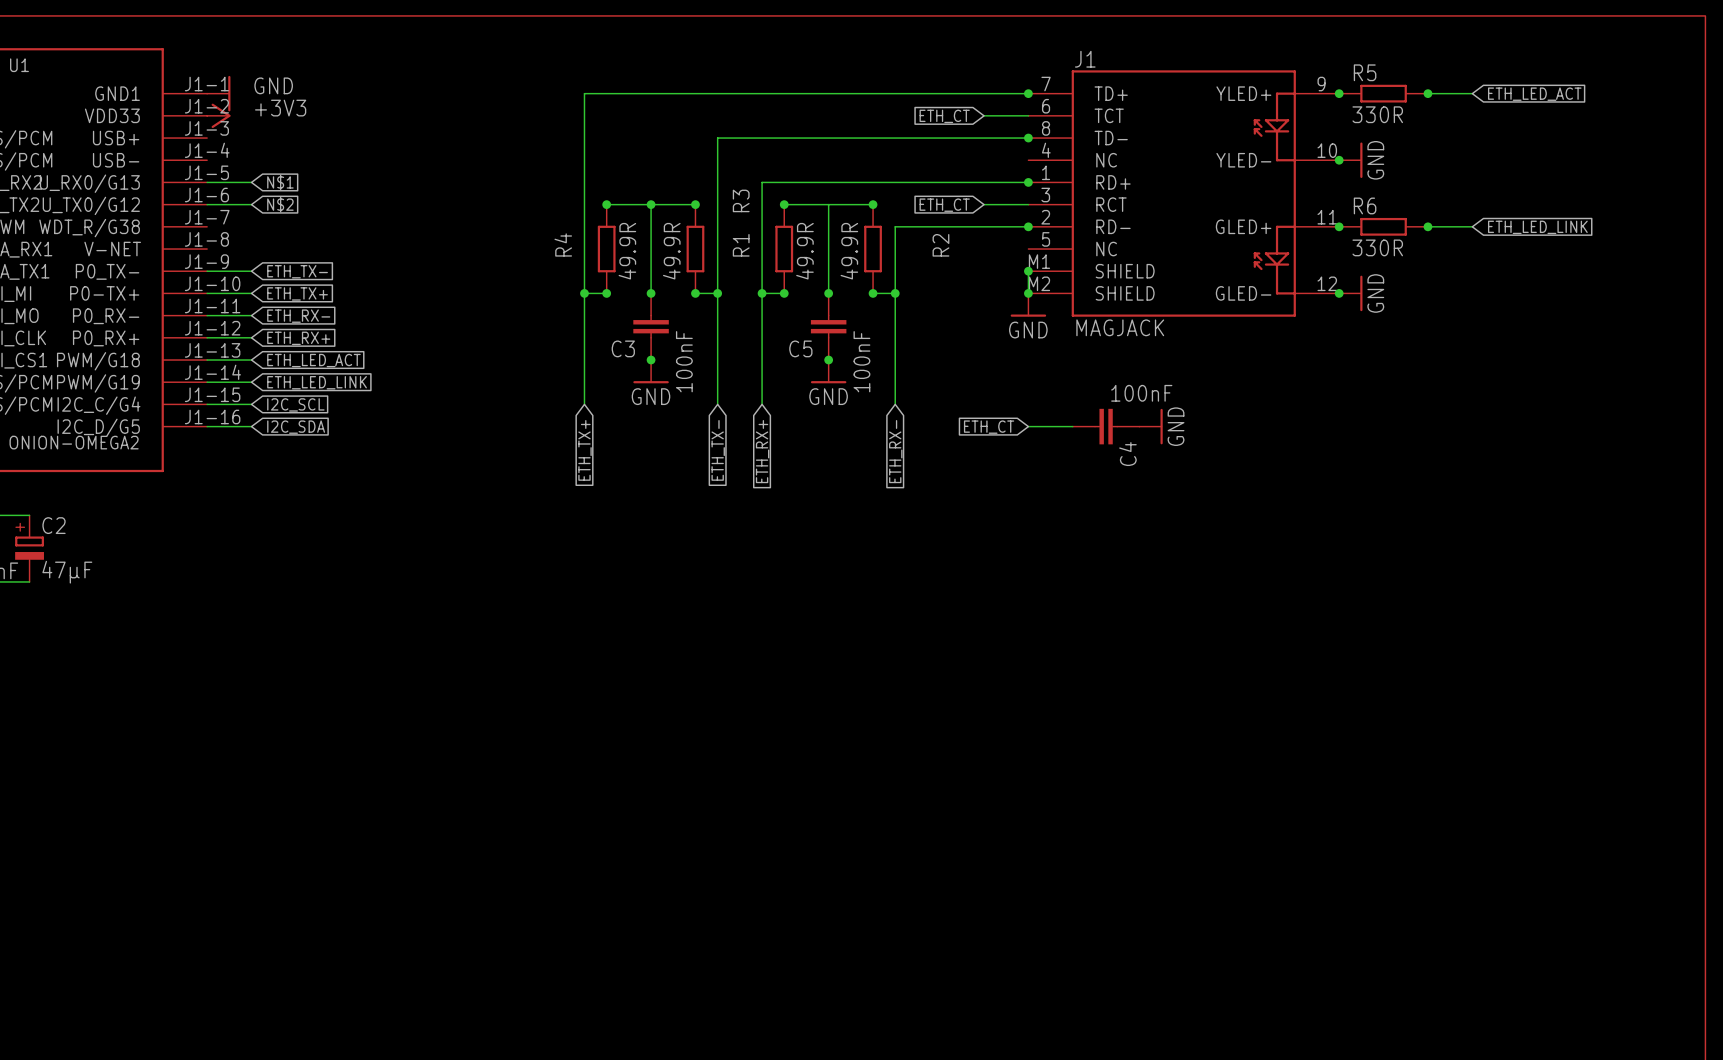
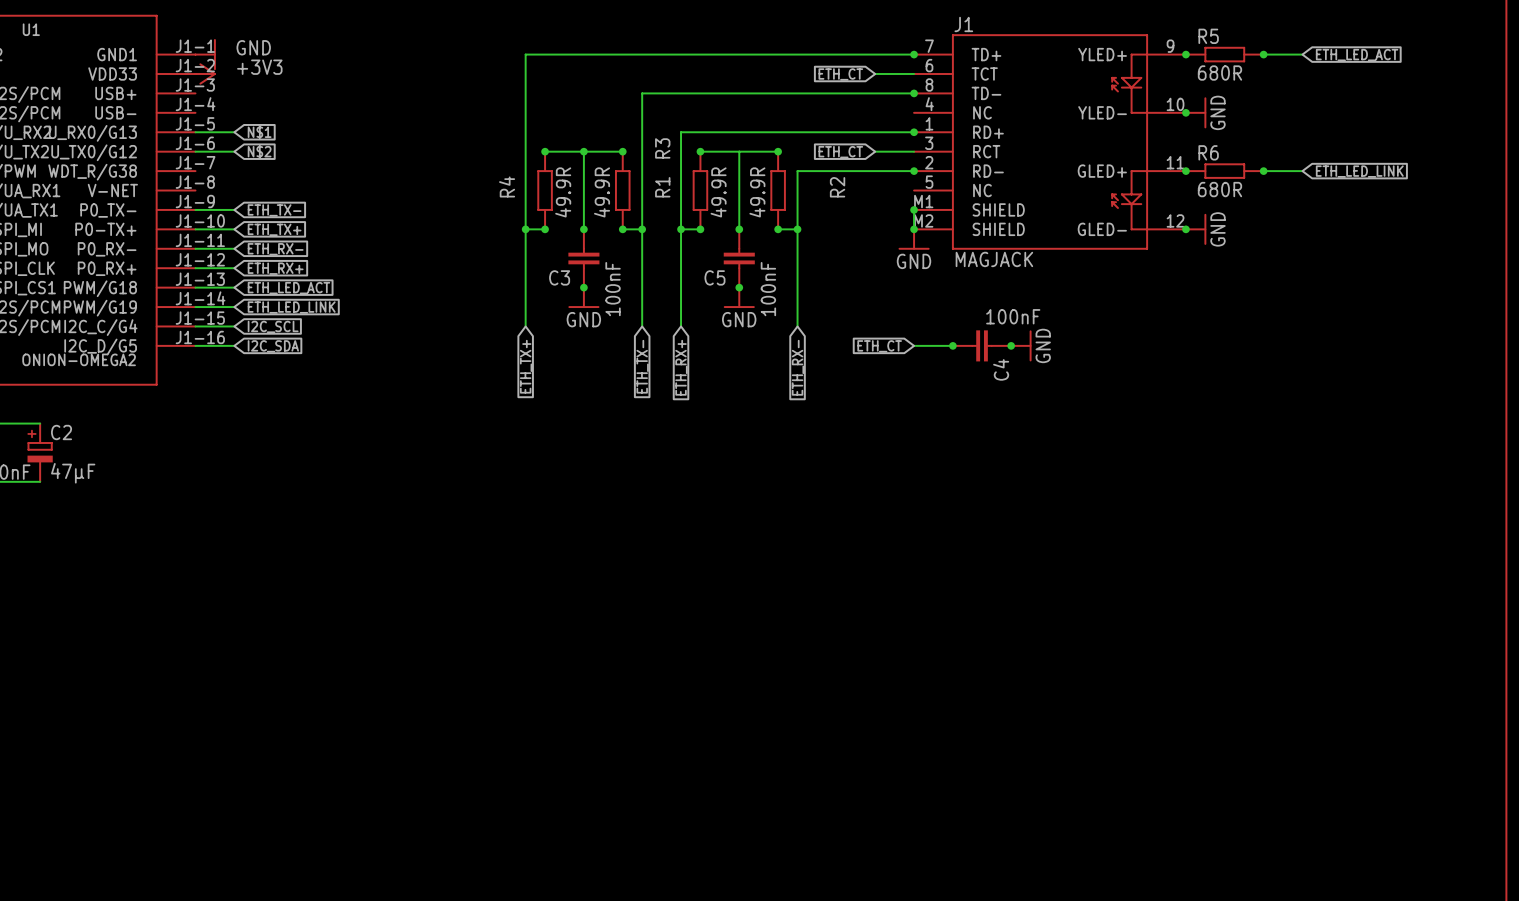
R5 value: 330R (1377, 114) -> 680R (1219, 73)
R6 value: 330R (1377, 247) -> 680R (1219, 189)
junction: none -> (952, 345)
junction: none -> (1011, 345)

